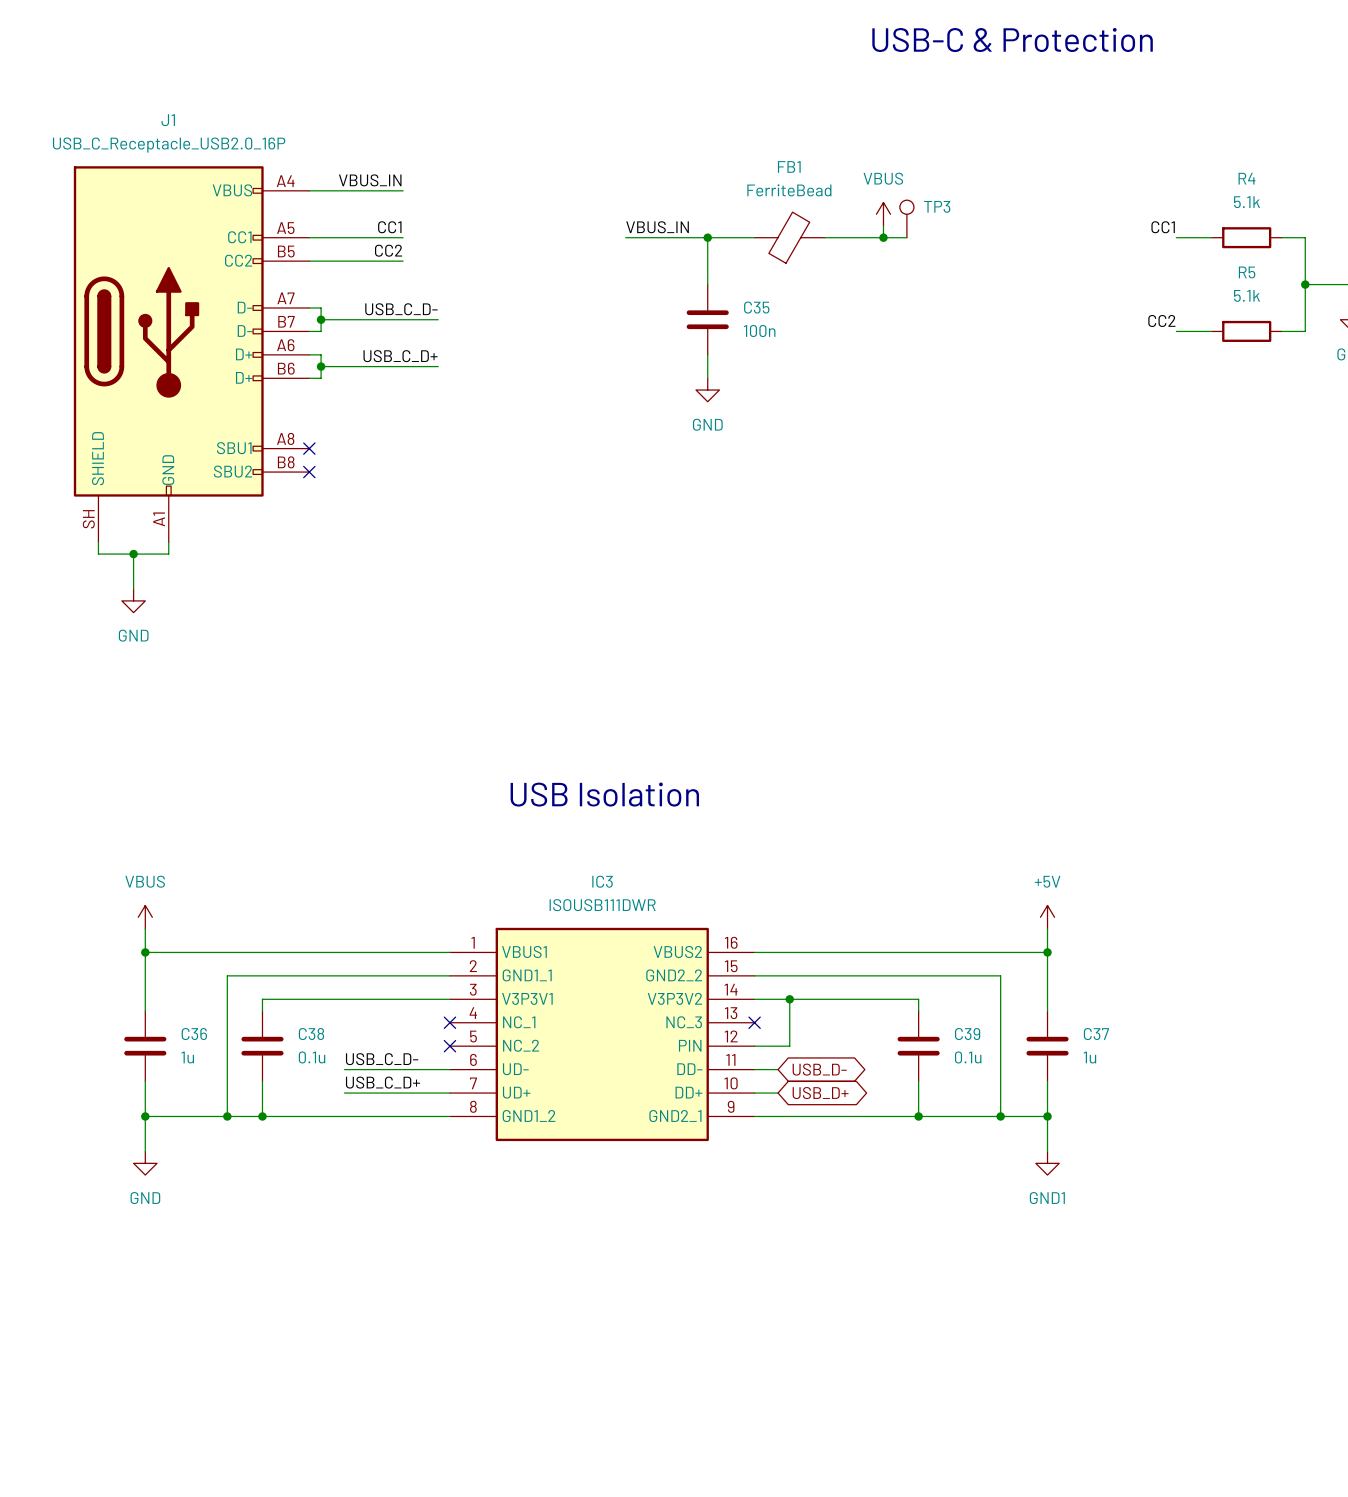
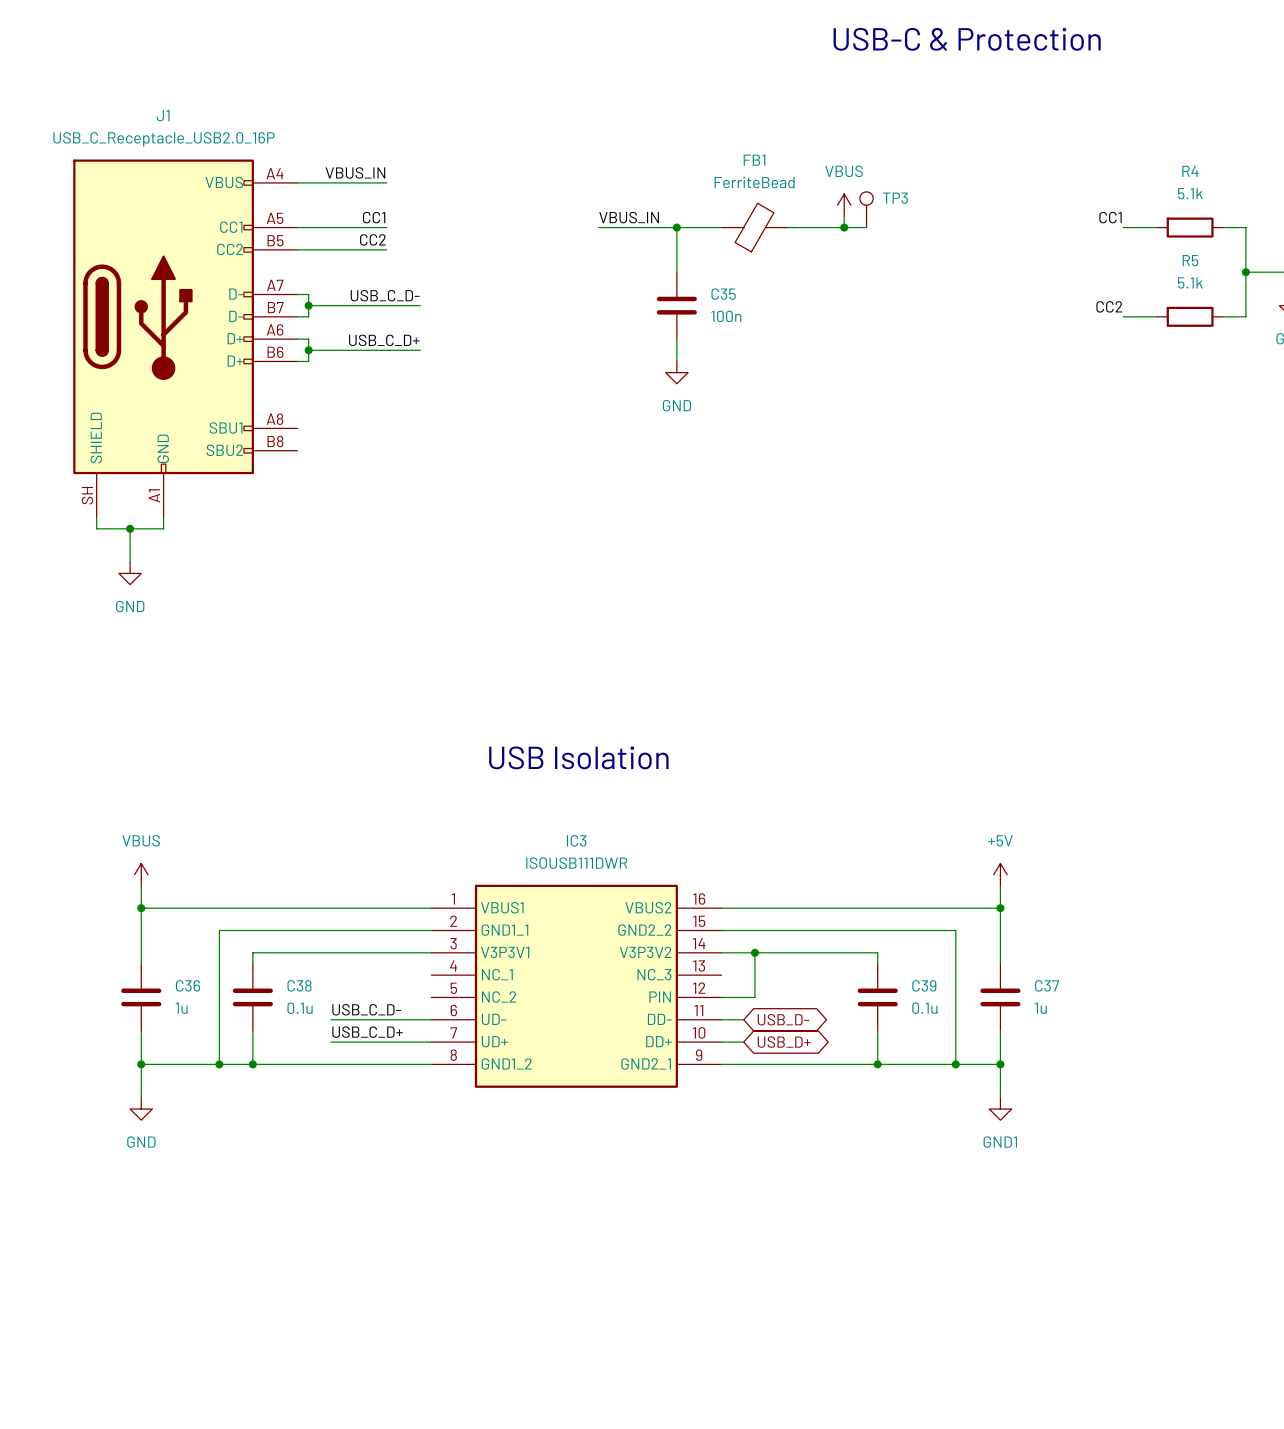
no-connect mark: (309, 448) -> none
no-connect mark: (309, 472) -> none
no-connect mark: (449, 1022) -> none
no-connect mark: (754, 1022) -> none
no-connect mark: (449, 1046) -> none

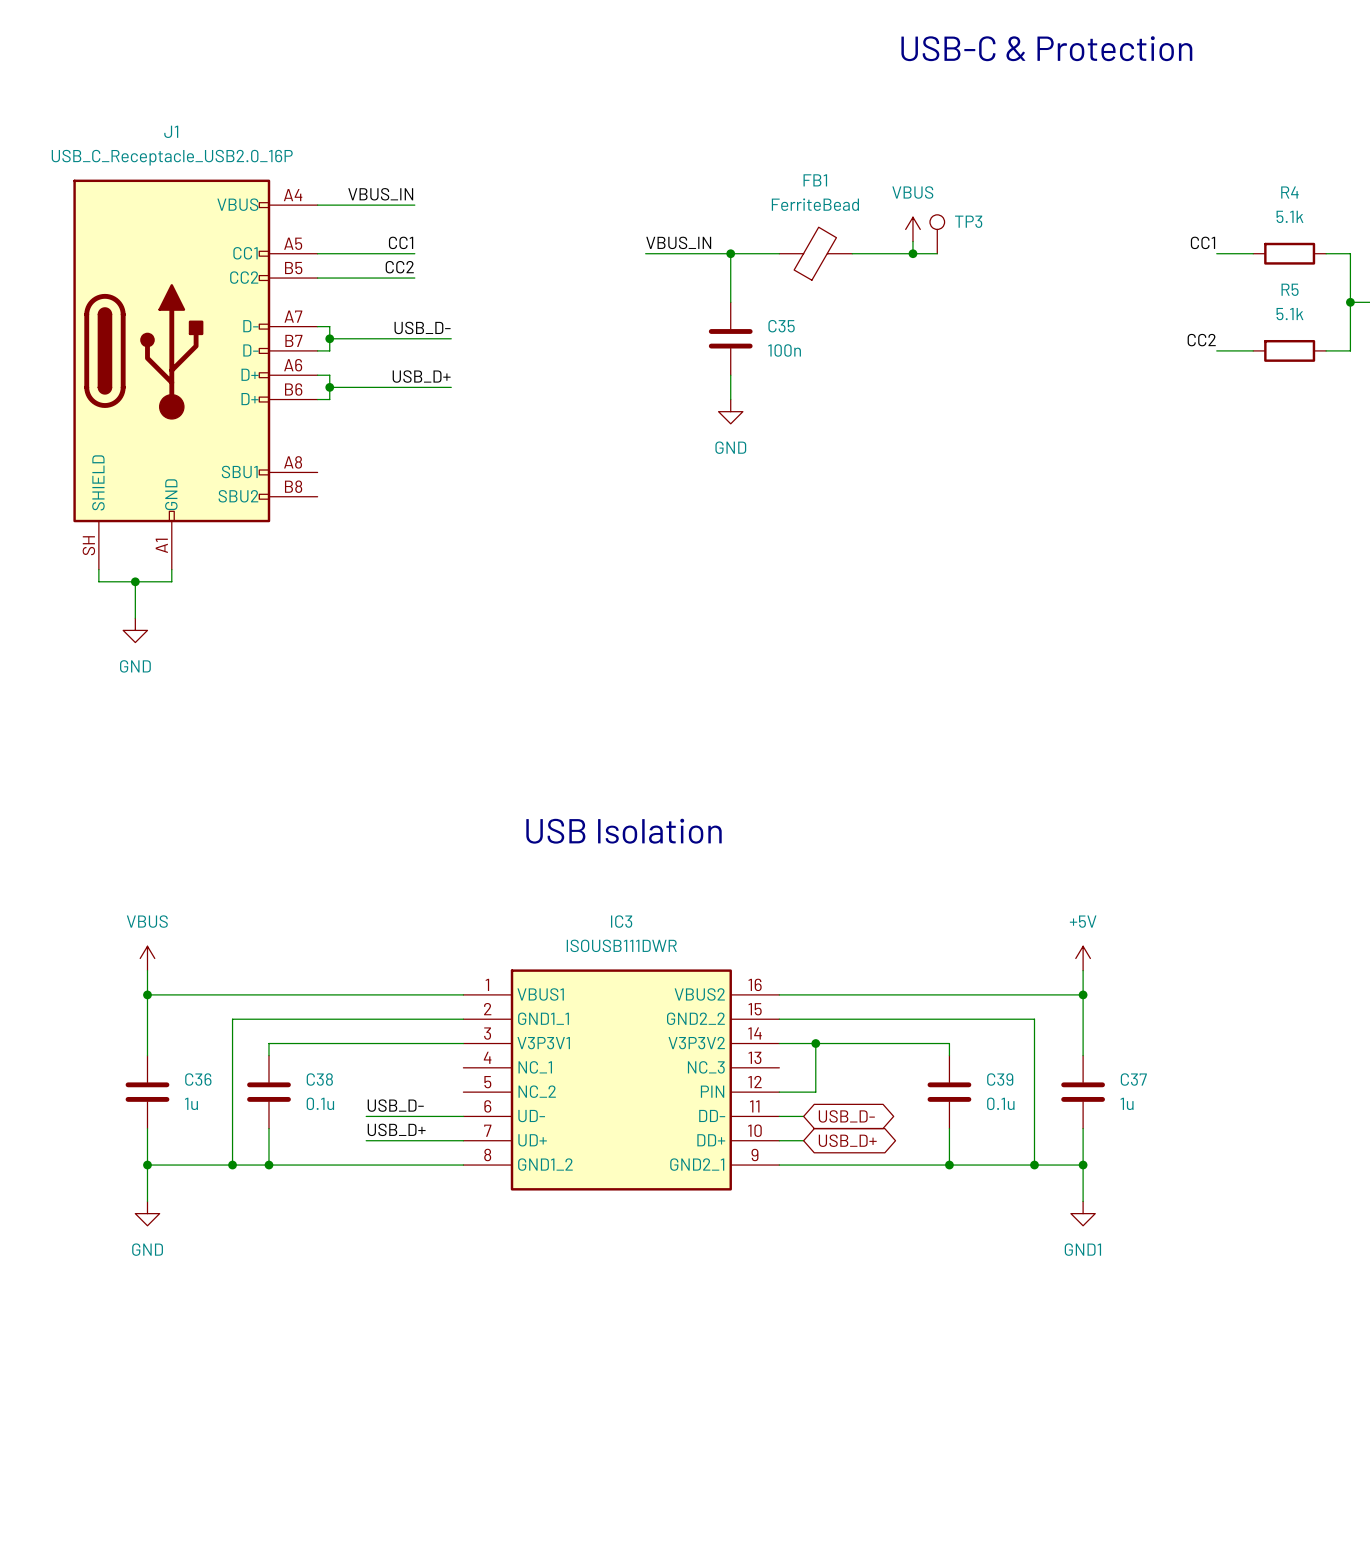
label: USB_C_D- (385, 295) -> USB_D- (422, 327)
label: USB_C_D+ (384, 340) -> USB_D+ (421, 376)
label: USB_C_D- (366, 1009) -> USB_D- (395, 1105)
wire: (330, 1019) (342, 1019) -> none
label: USB_C_D+ (367, 1032) -> USB_D+ (396, 1129)
wire: (330, 1042) (342, 1042) -> none

